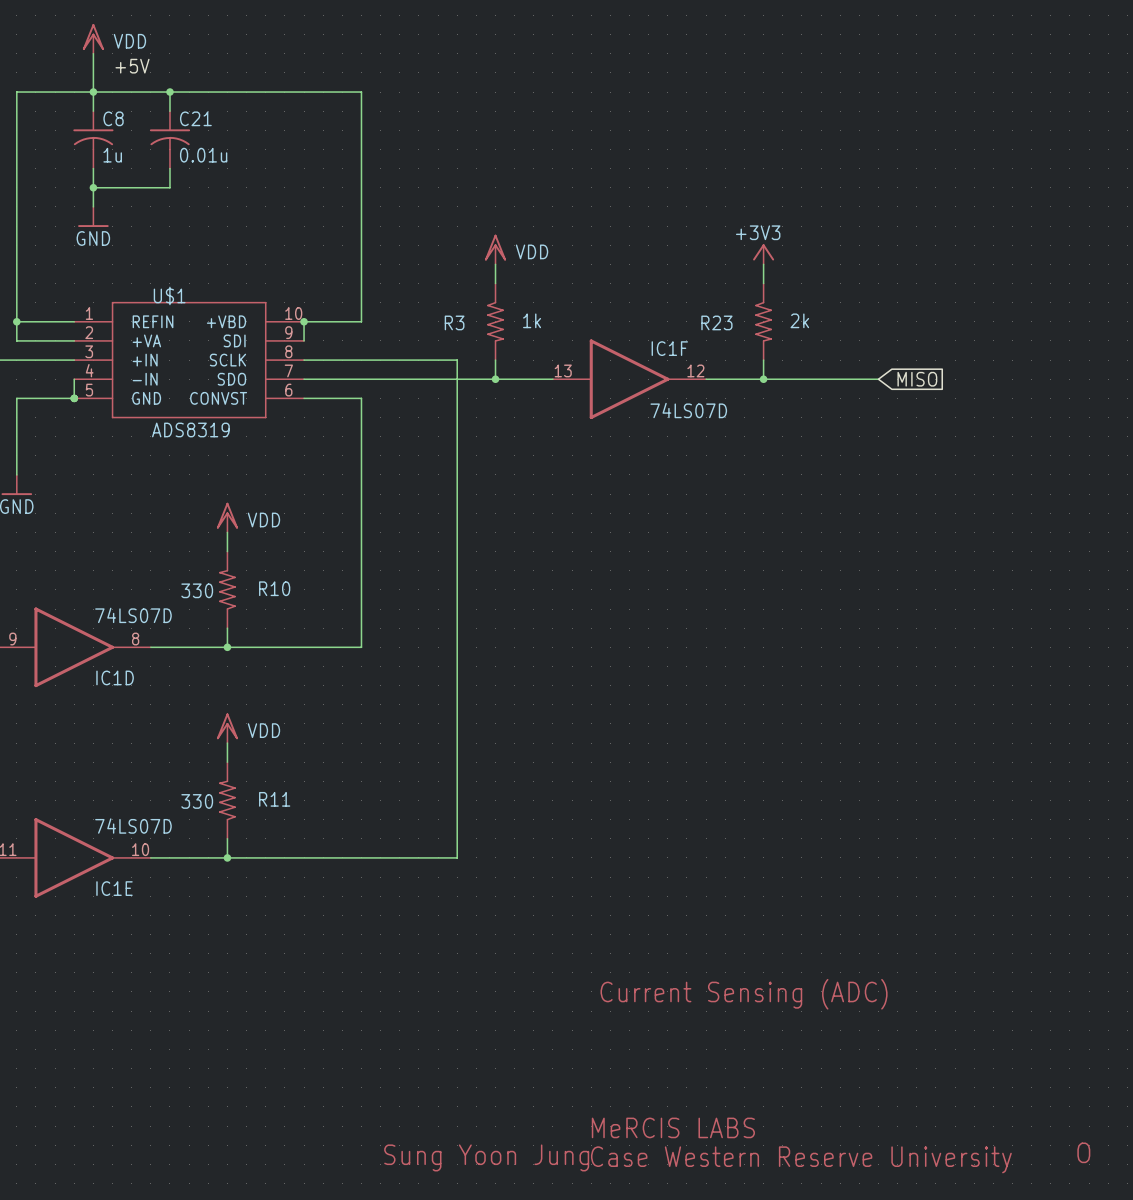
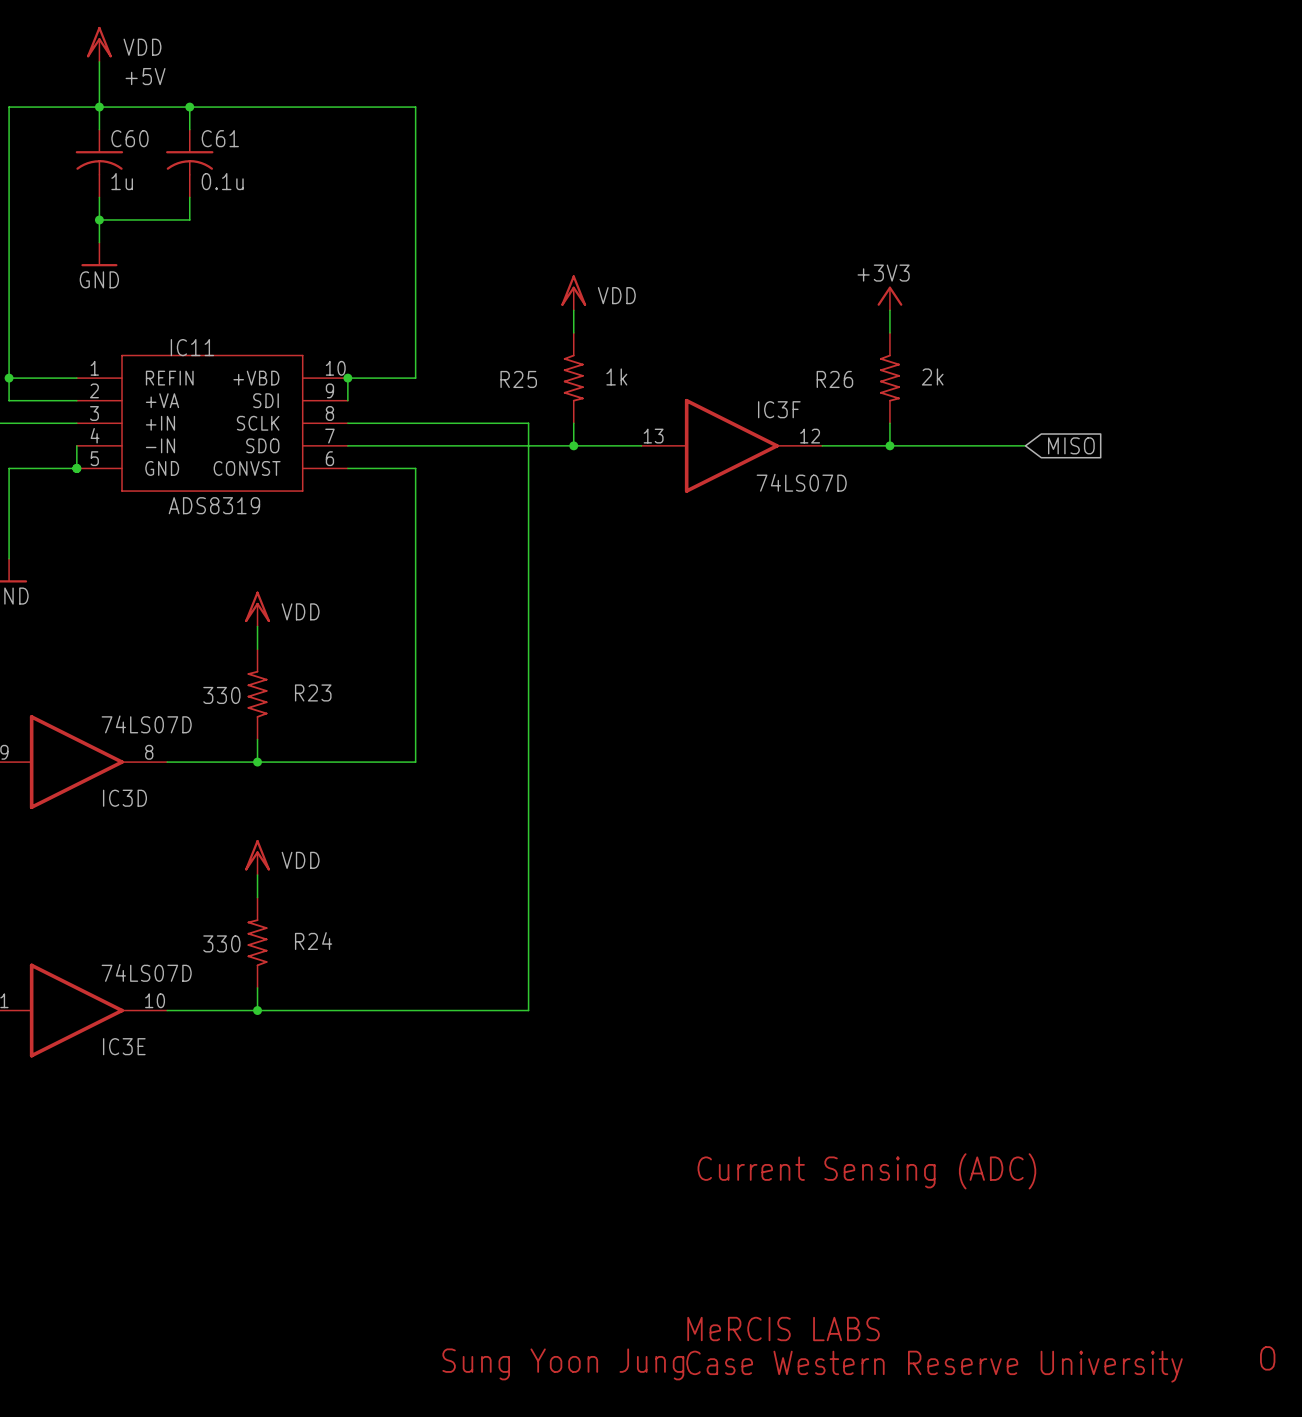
C8 name: C8 (113, 118) -> C60 (129, 138)
C21 name: C21 (195, 118) -> C61 (220, 138)
C21 value: 0.01u (203, 155) -> 0.1u (222, 181)
U$1 name: U$1 (169, 295) -> IC11 (192, 347)
R3 name: R3 (454, 322) -> R25 (518, 379)
R23 name: R23 (716, 322) -> R26 (834, 379)
IC1F name: IC1F (669, 348) -> IC3F (779, 409)
R10 name: R10 (274, 588) -> R23 (313, 692)
IC1D name: IC1D (115, 677) -> IC3D (124, 798)
R11 name: R11 (274, 799) -> R24 (313, 941)
IC1E name: IC1E (114, 888) -> IC3E (124, 1046)

